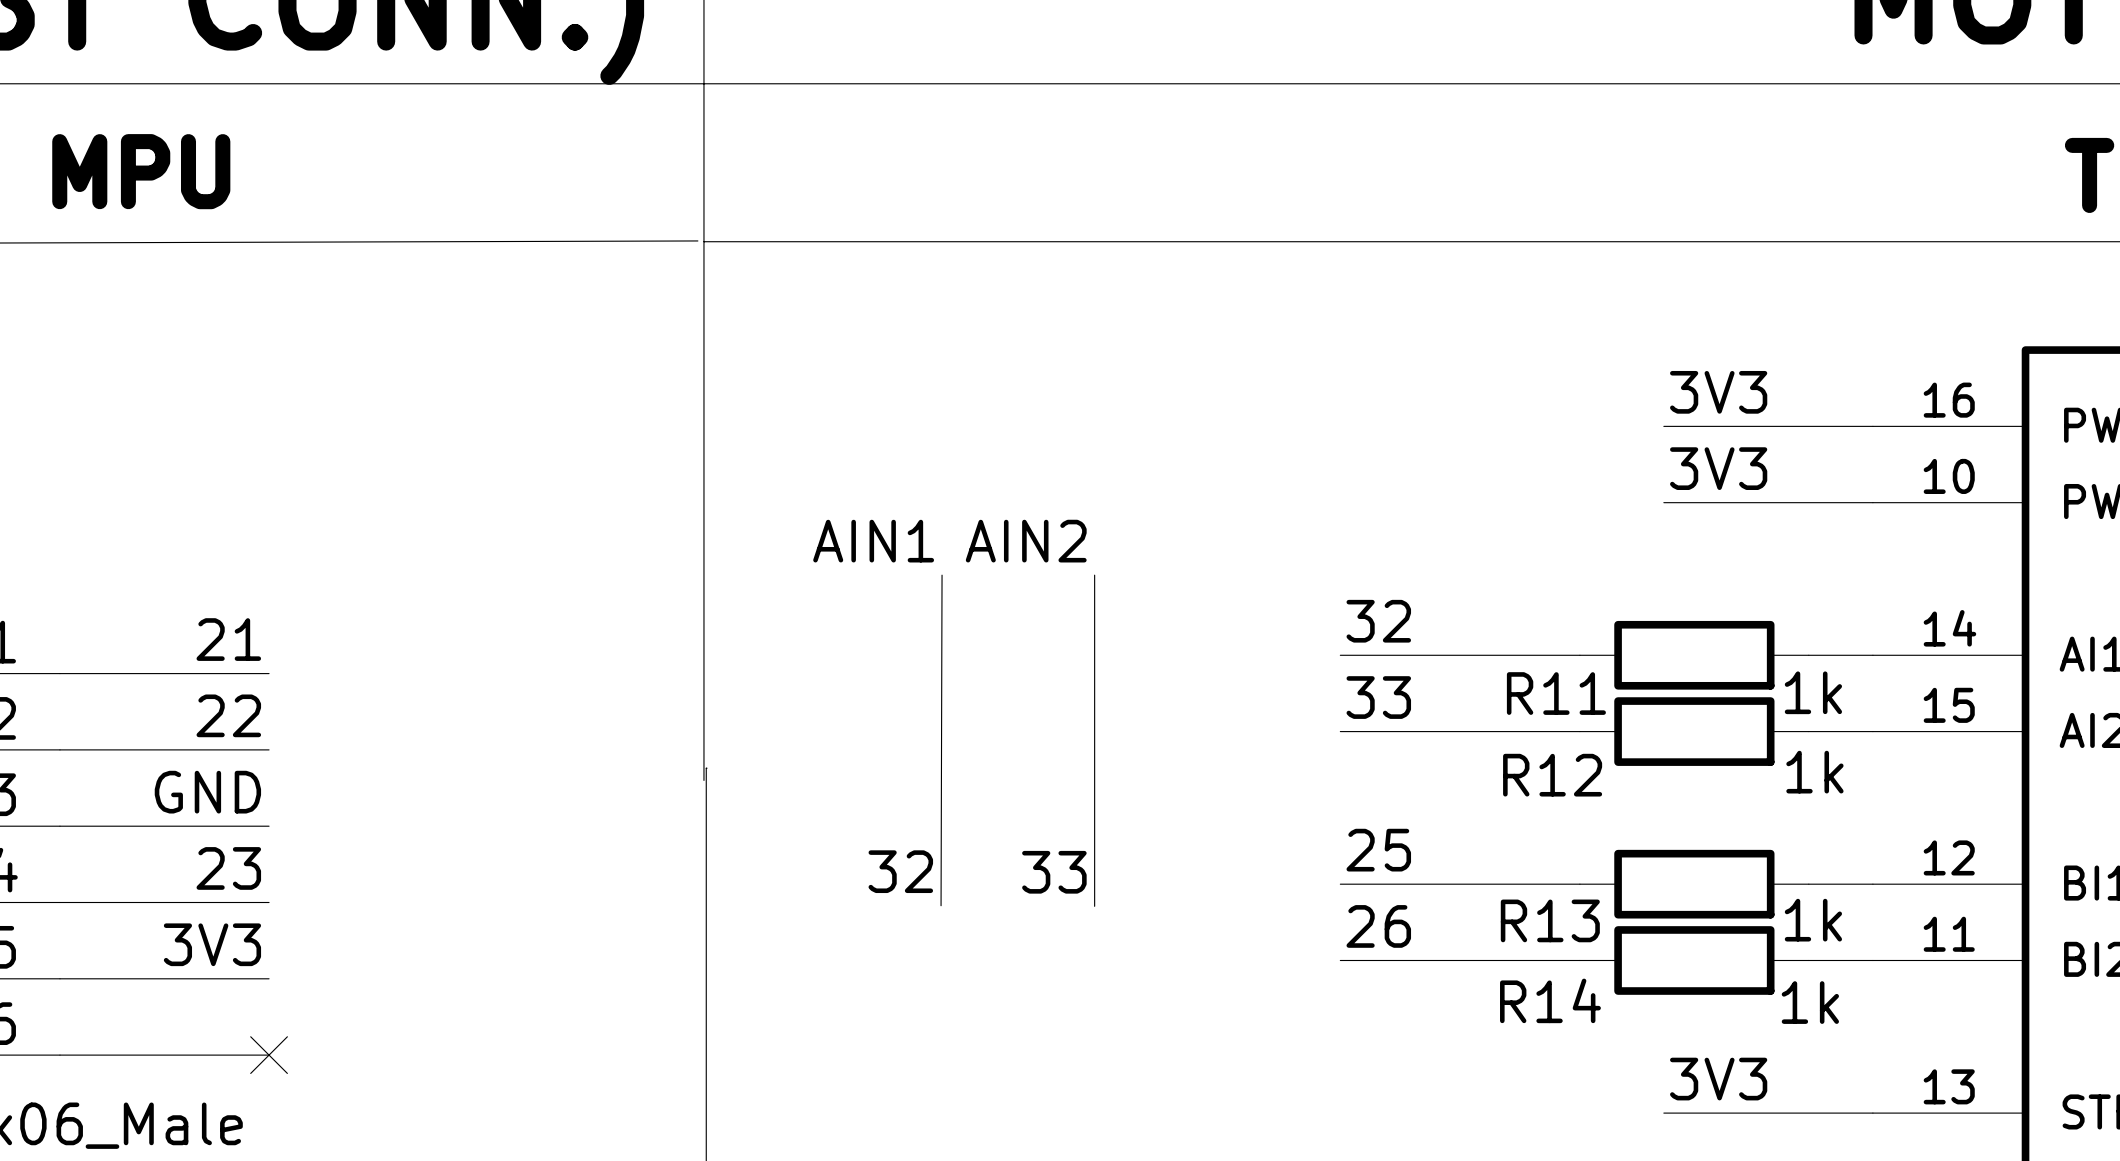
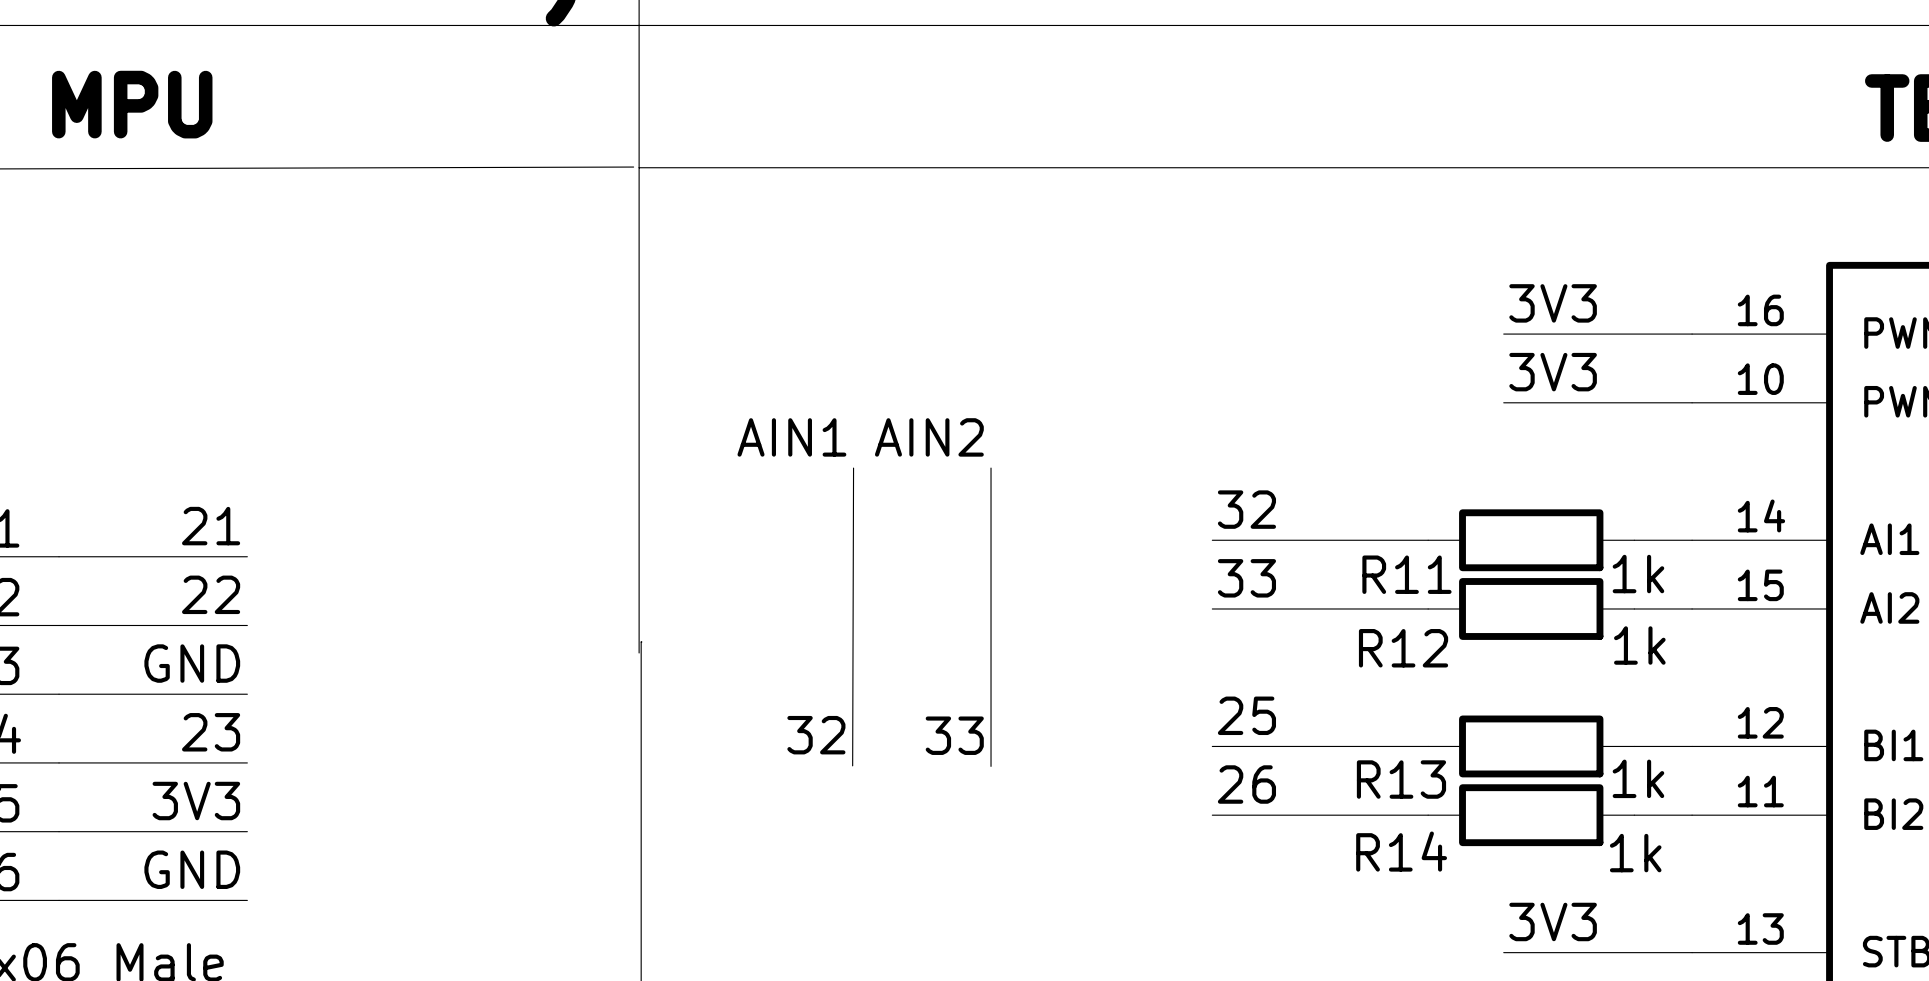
label: none -> GND (192, 869)
no-connect mark: (269, 1055) -> none

